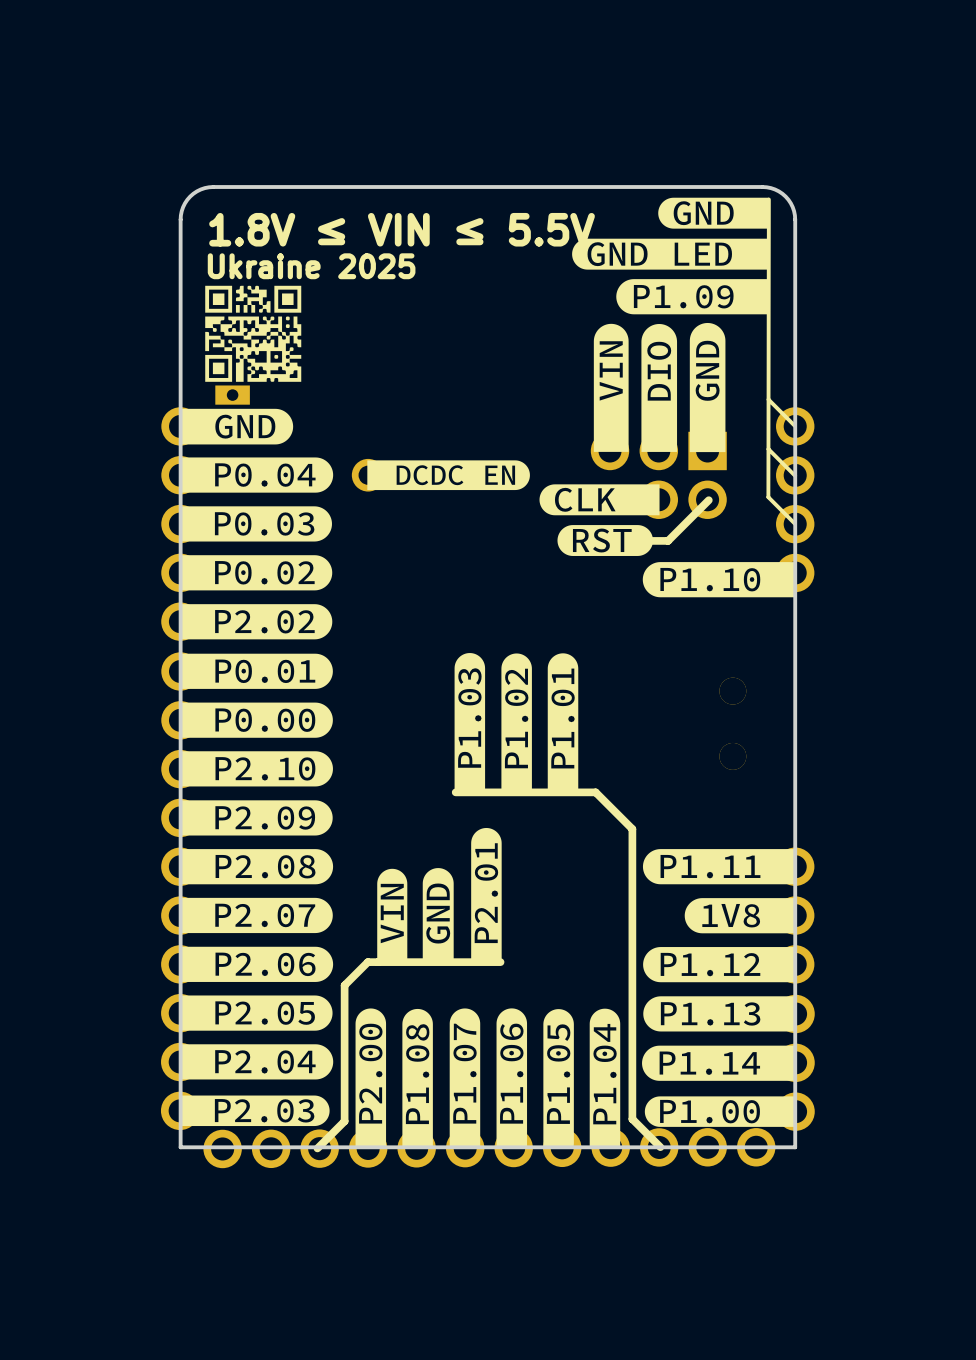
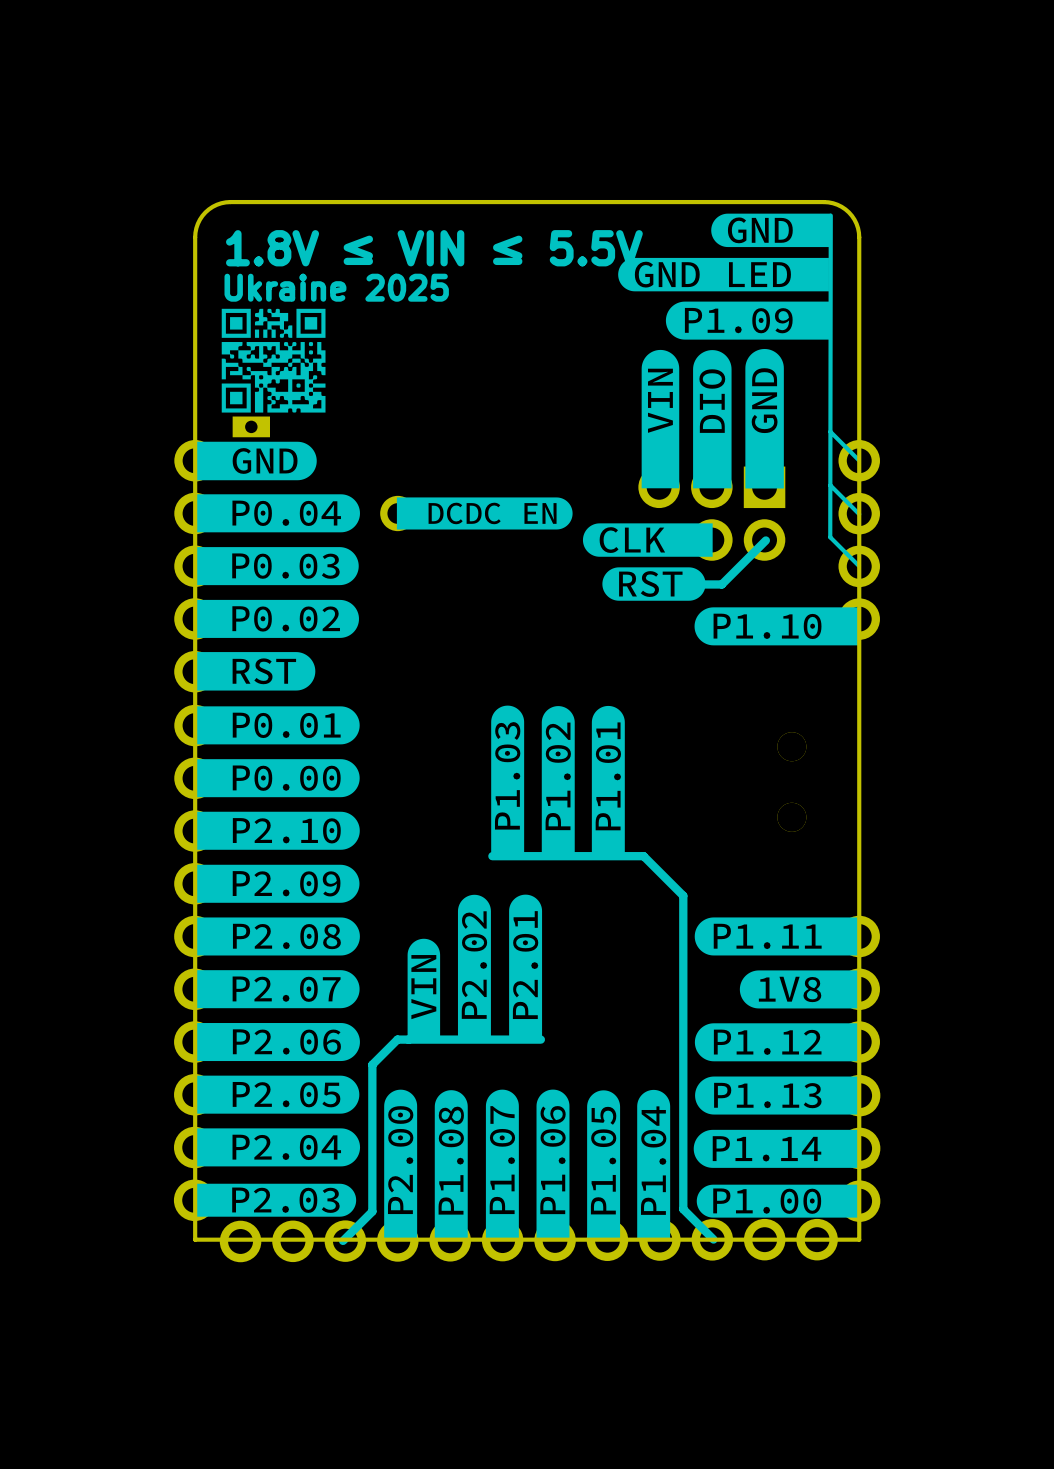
drawing shape: [179, 604, 333, 640] -> [194, 652, 316, 691]
drawing shape: [422, 868, 454, 962] -> [457, 894, 491, 1038]

